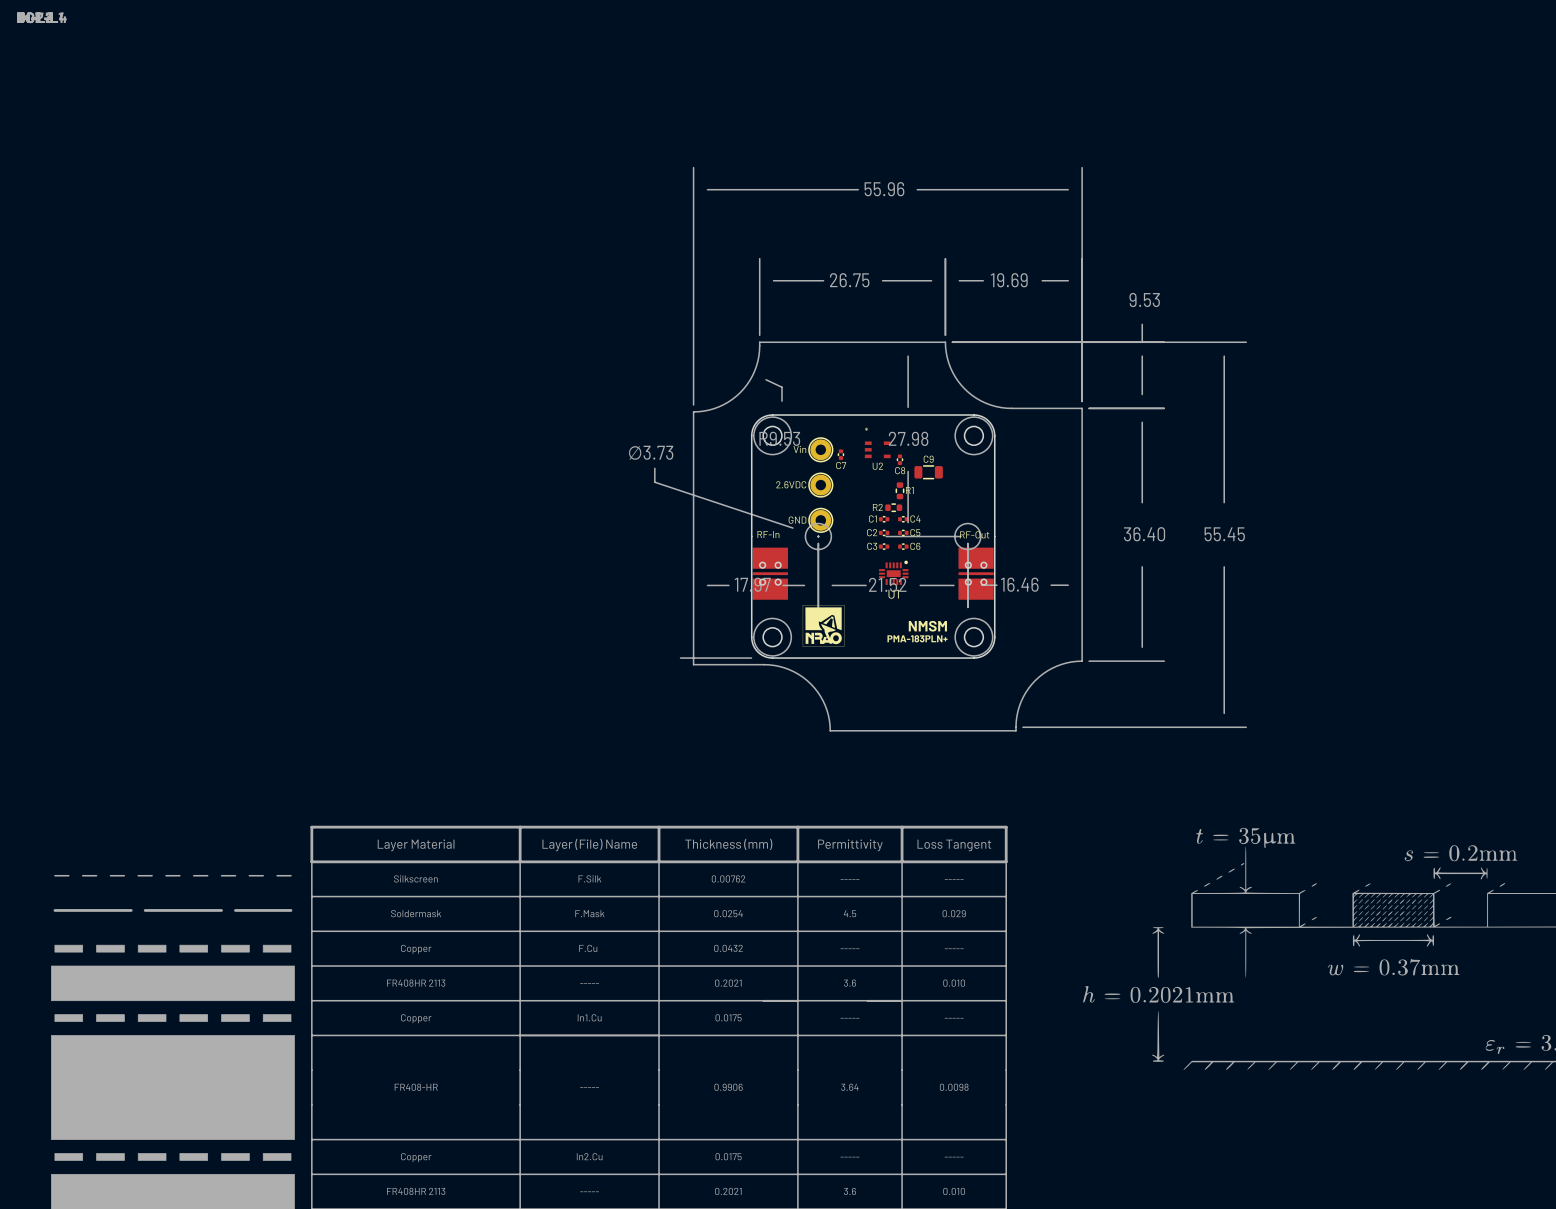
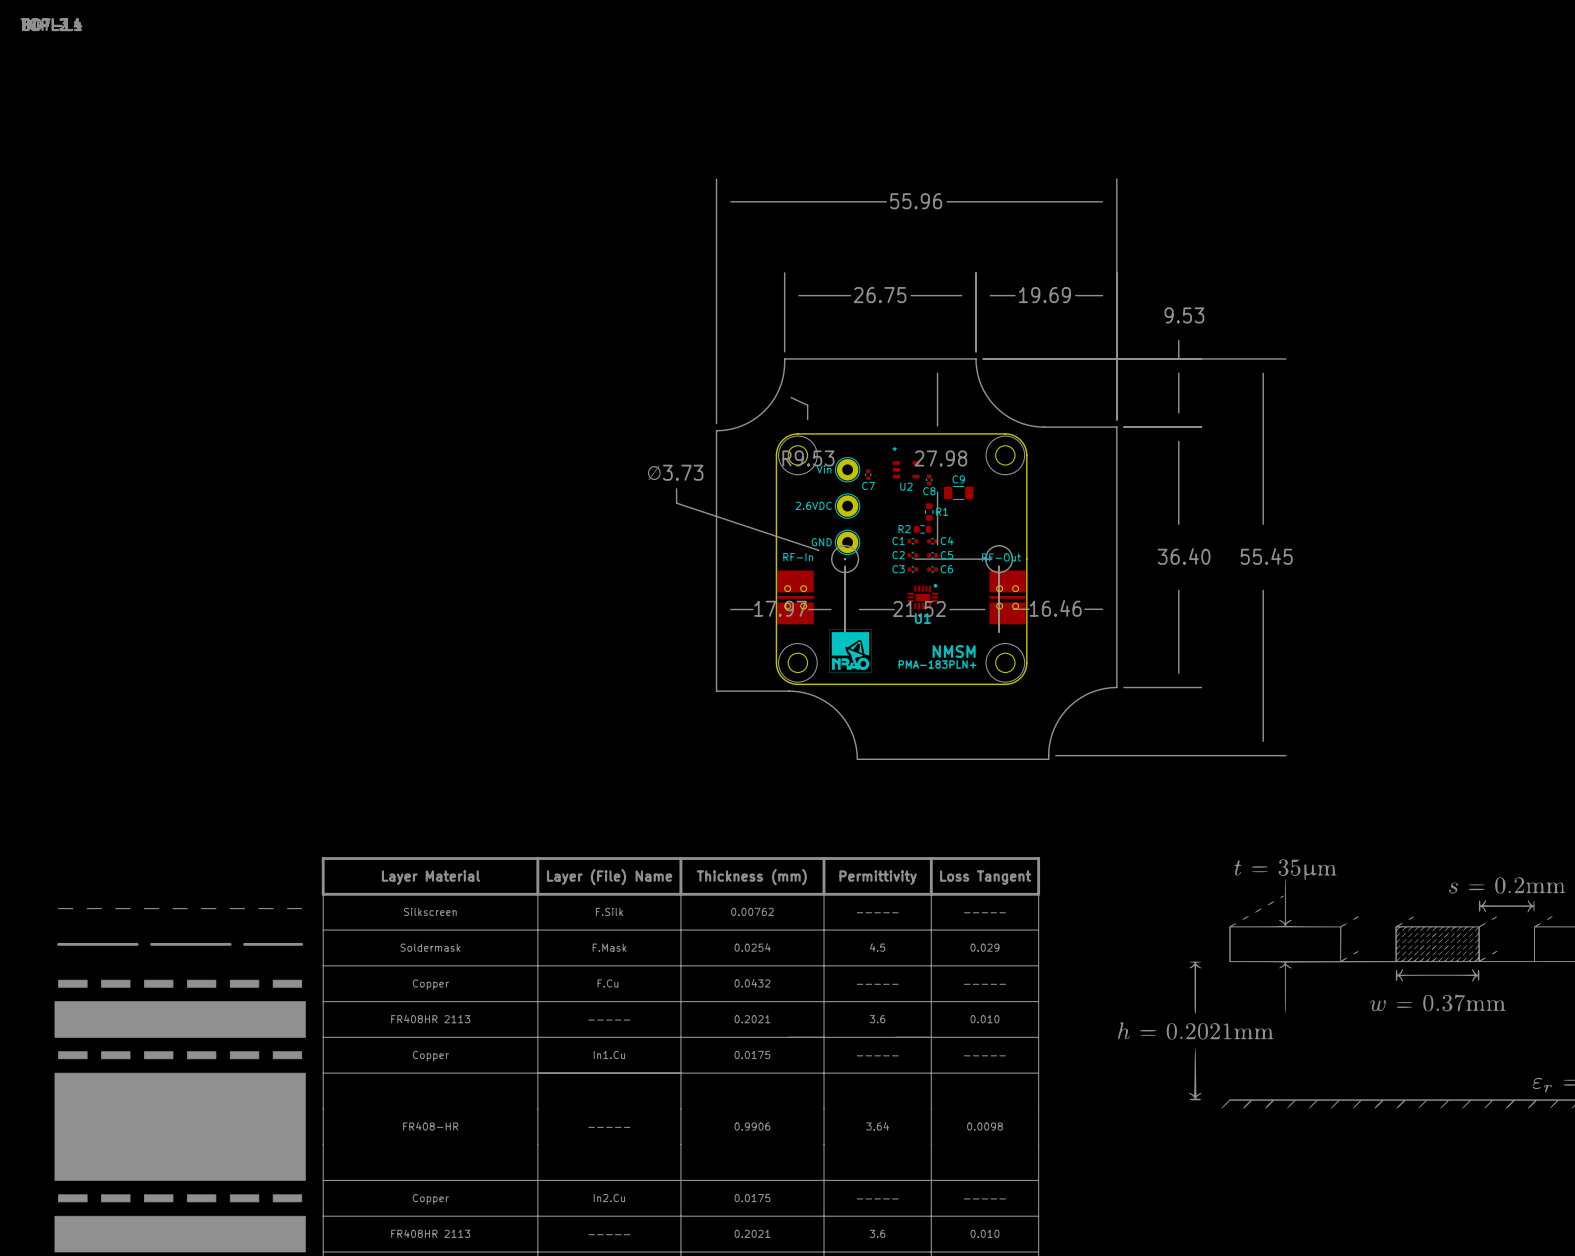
line: (680, 658) (751, 658) -> none

